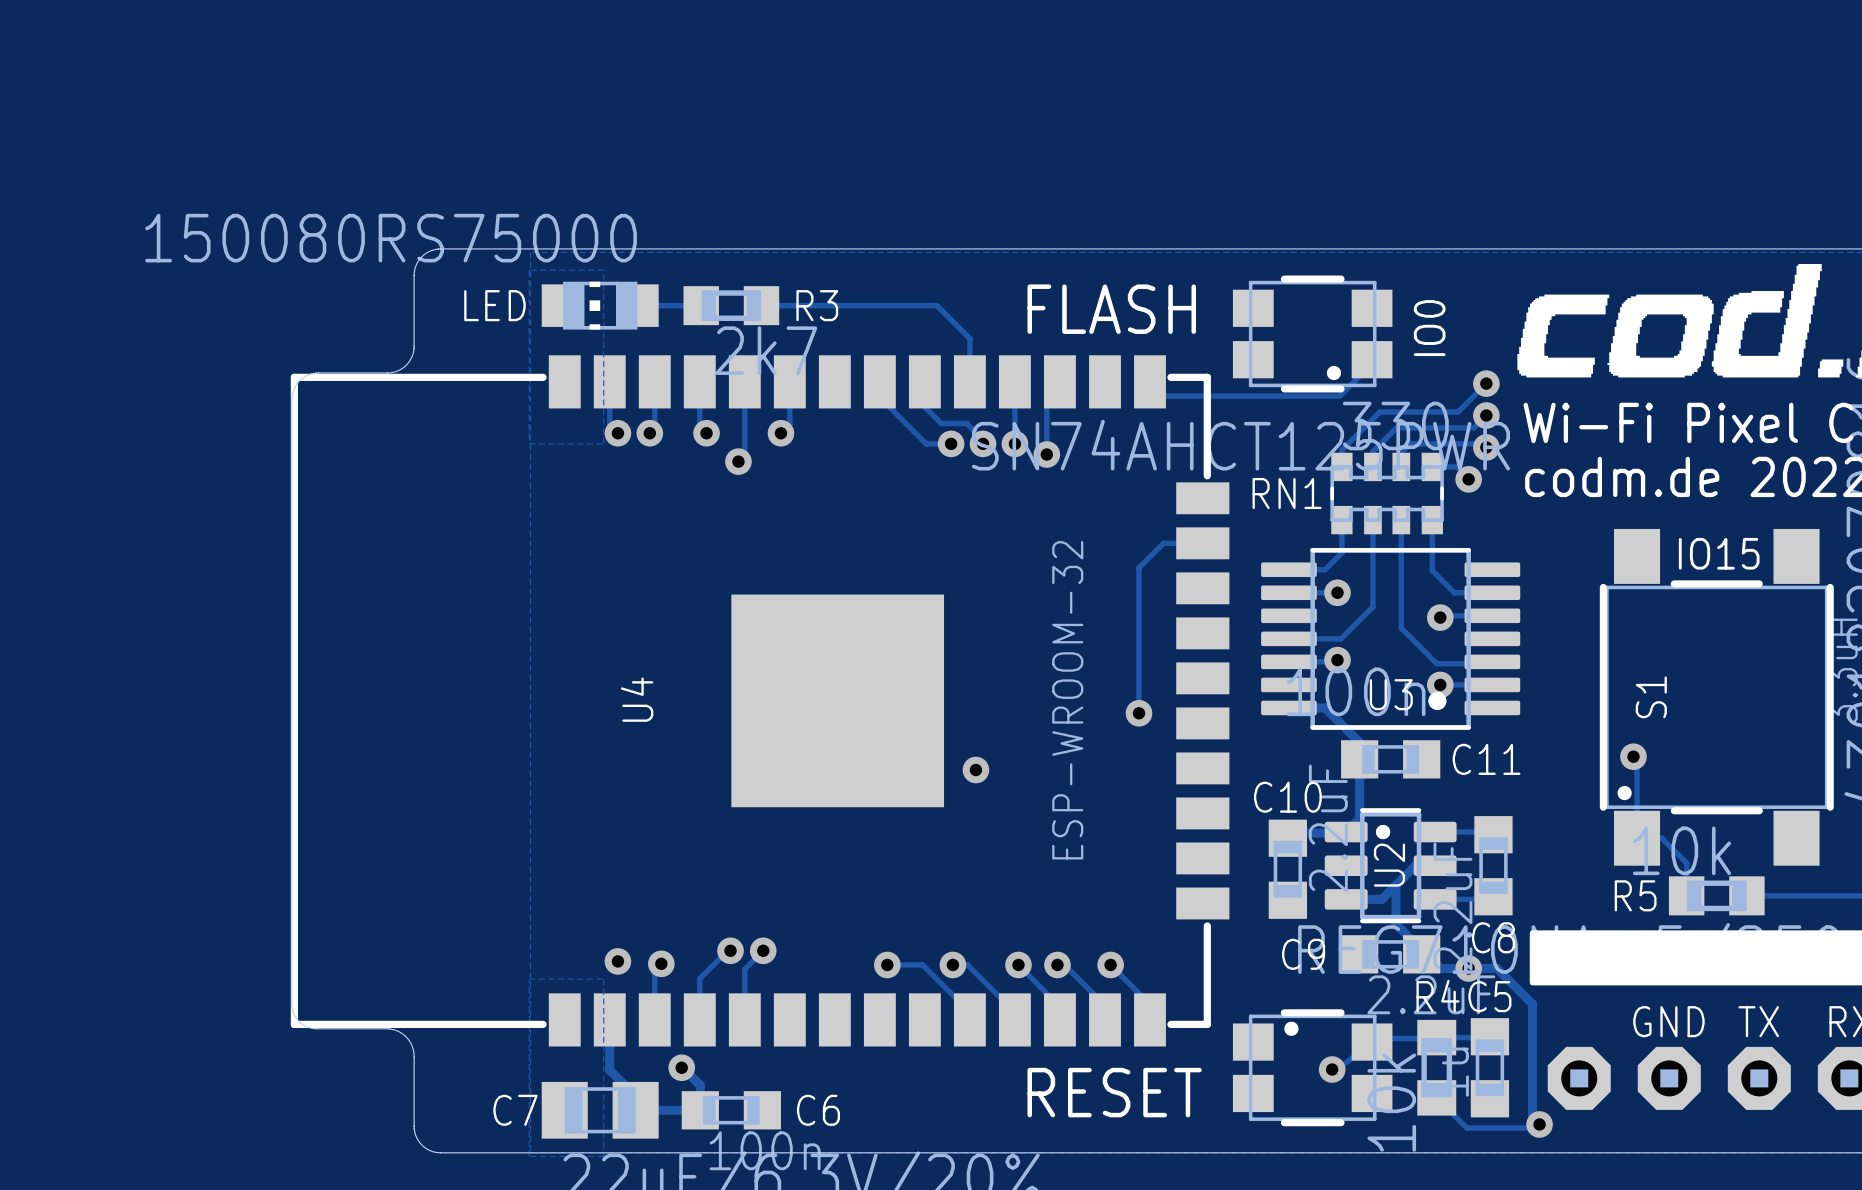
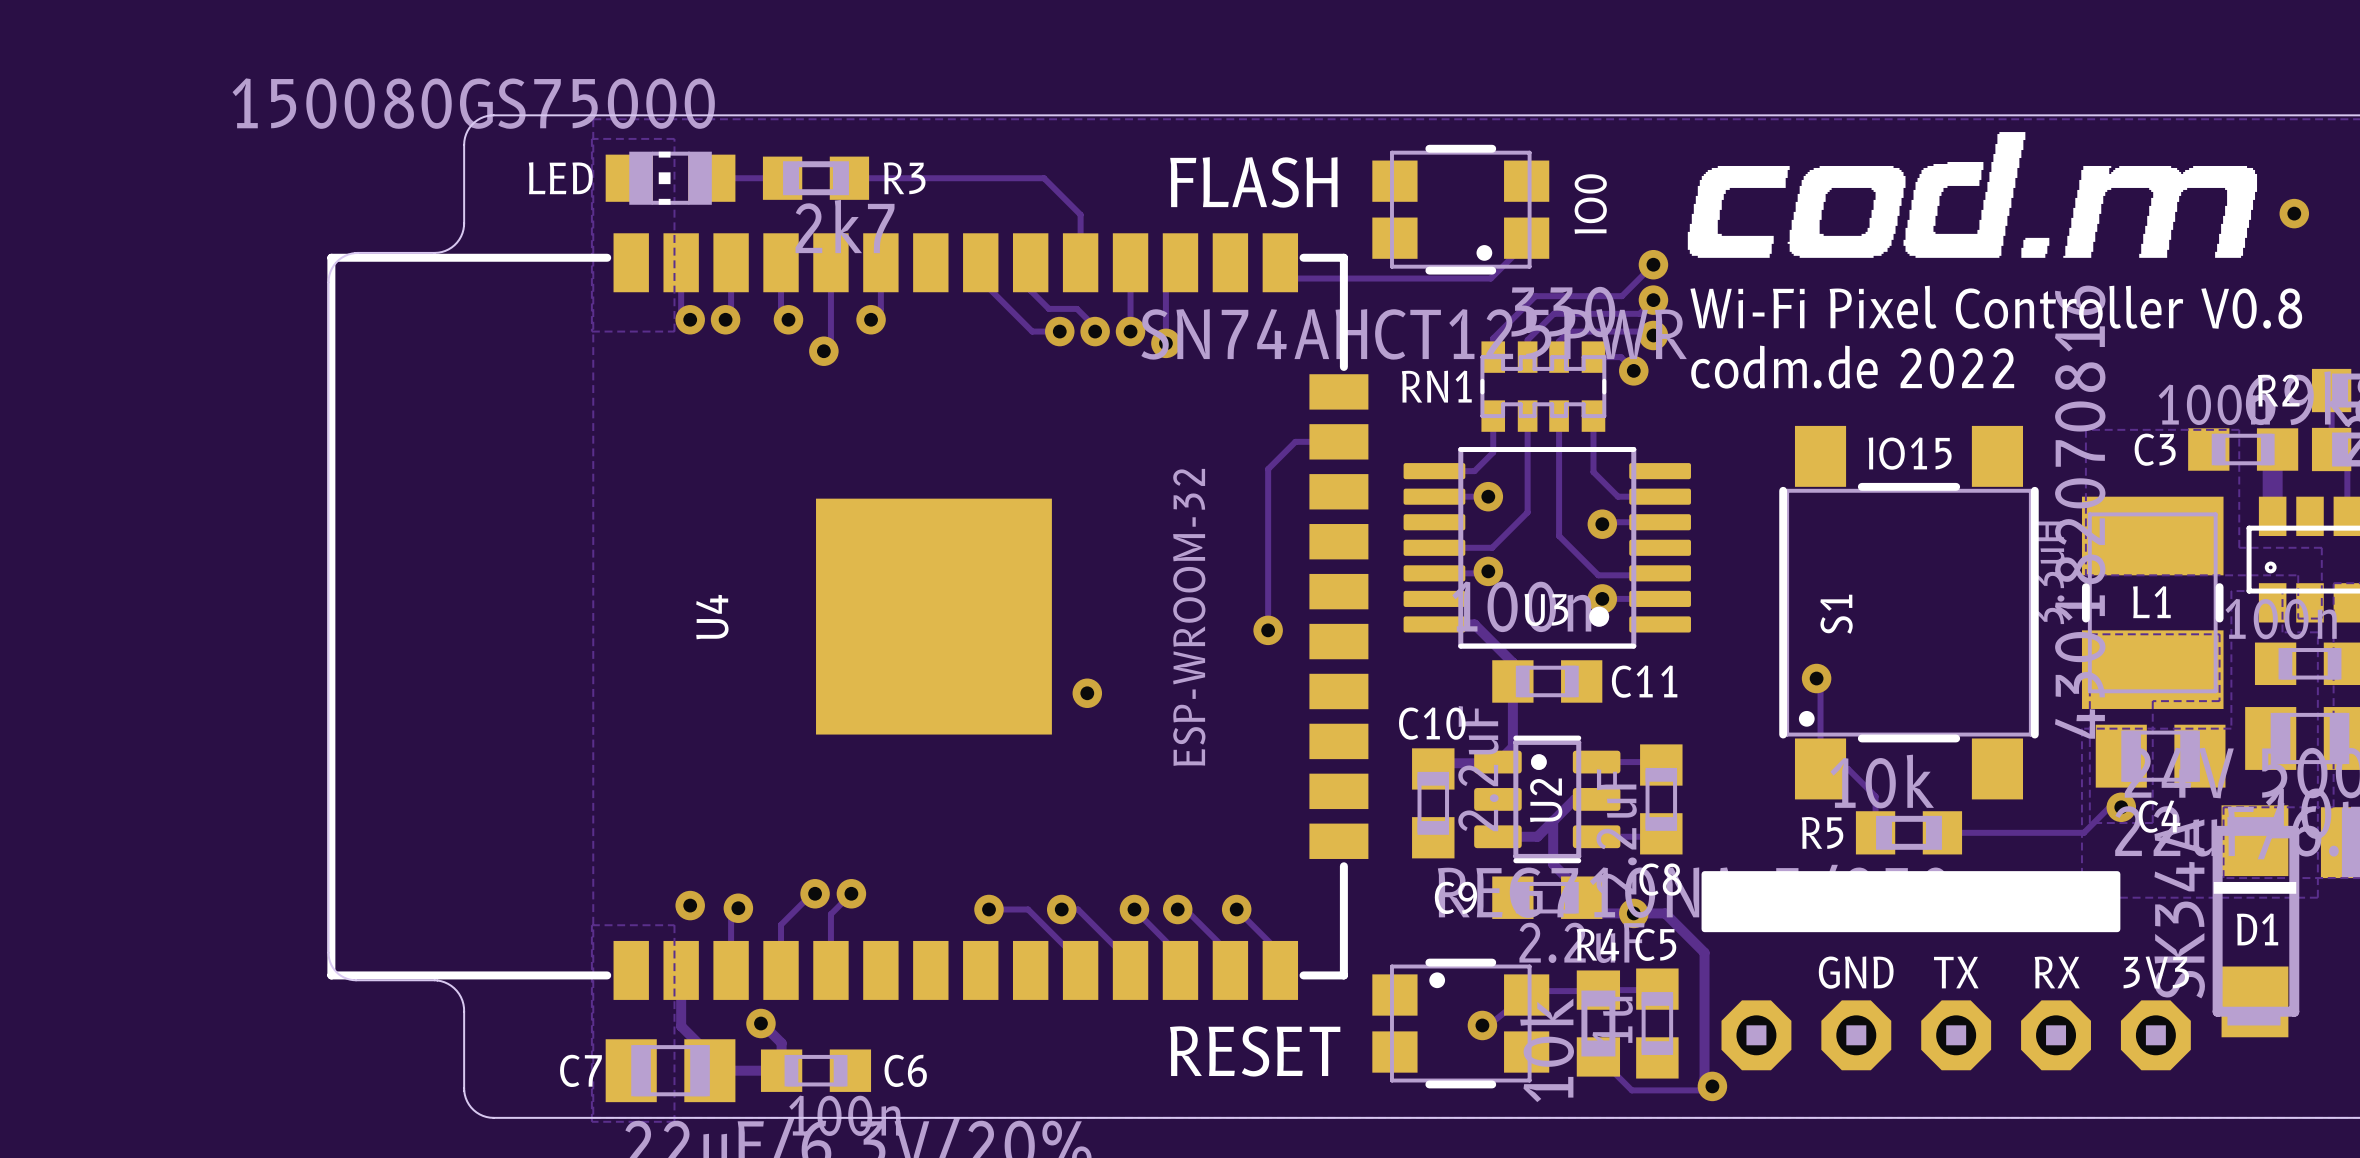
LED value: 150080RS75000 (391, 238) -> 150080GS75000 (473, 103)

